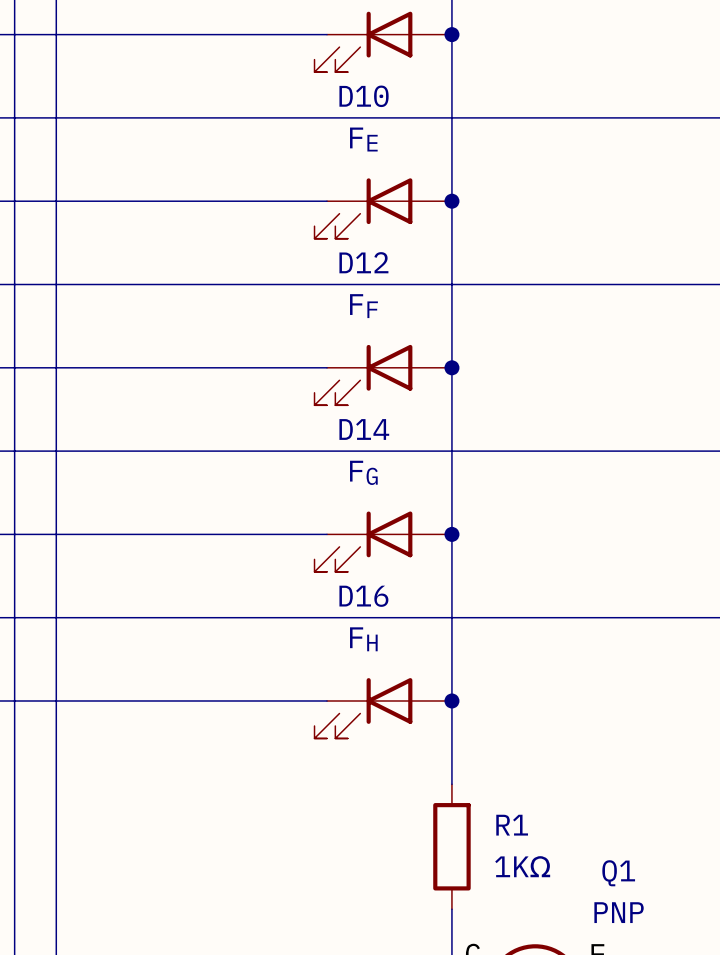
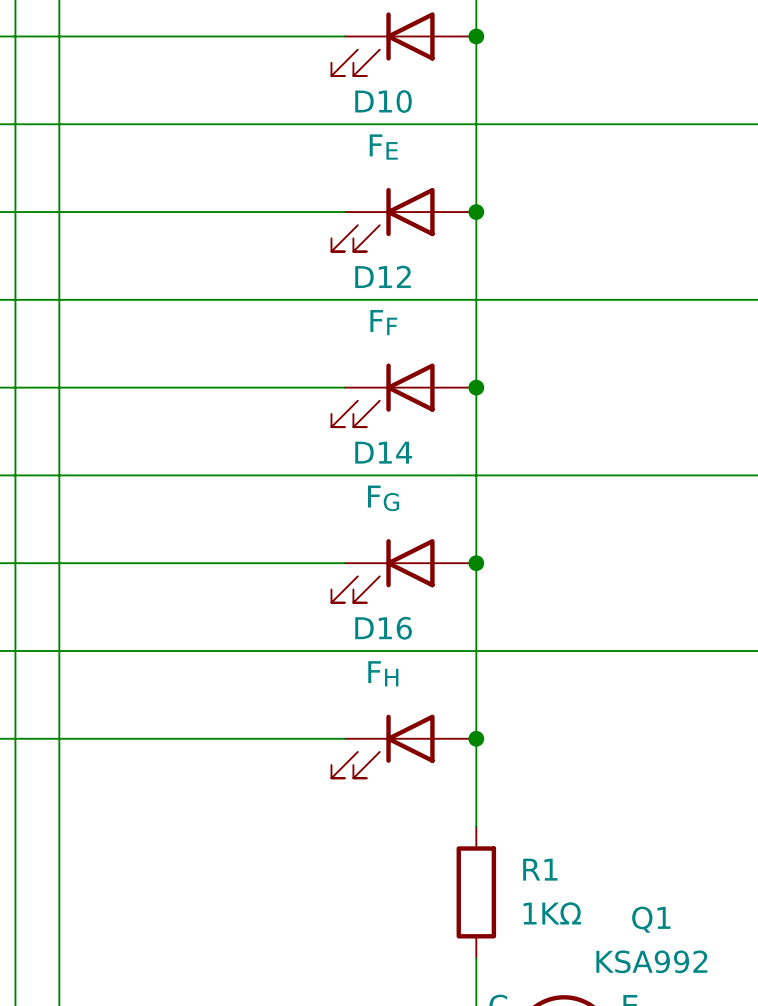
Q1 value: PNP (619, 912) -> KSA992 (651, 961)

